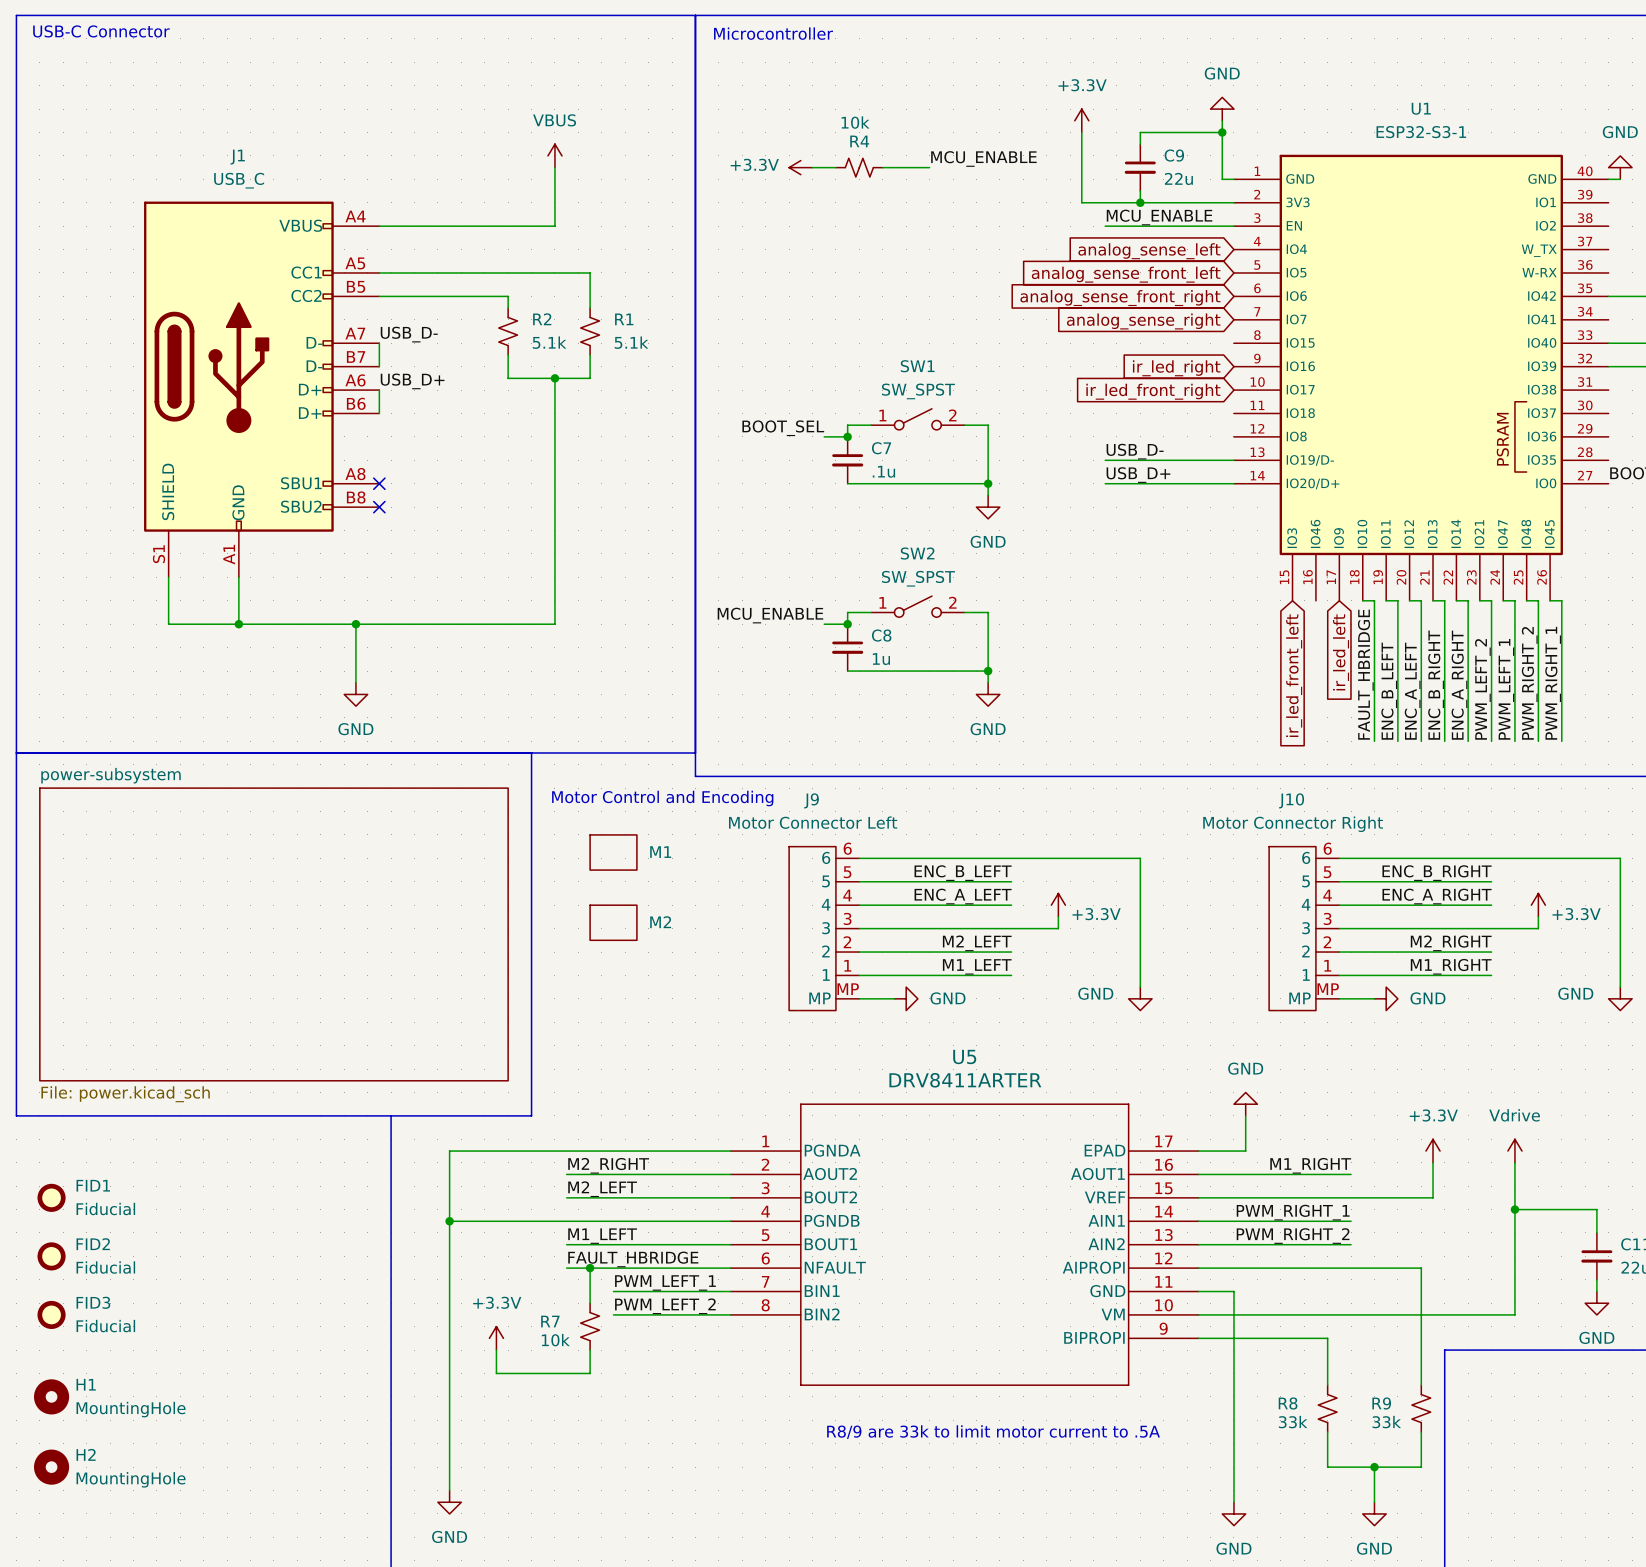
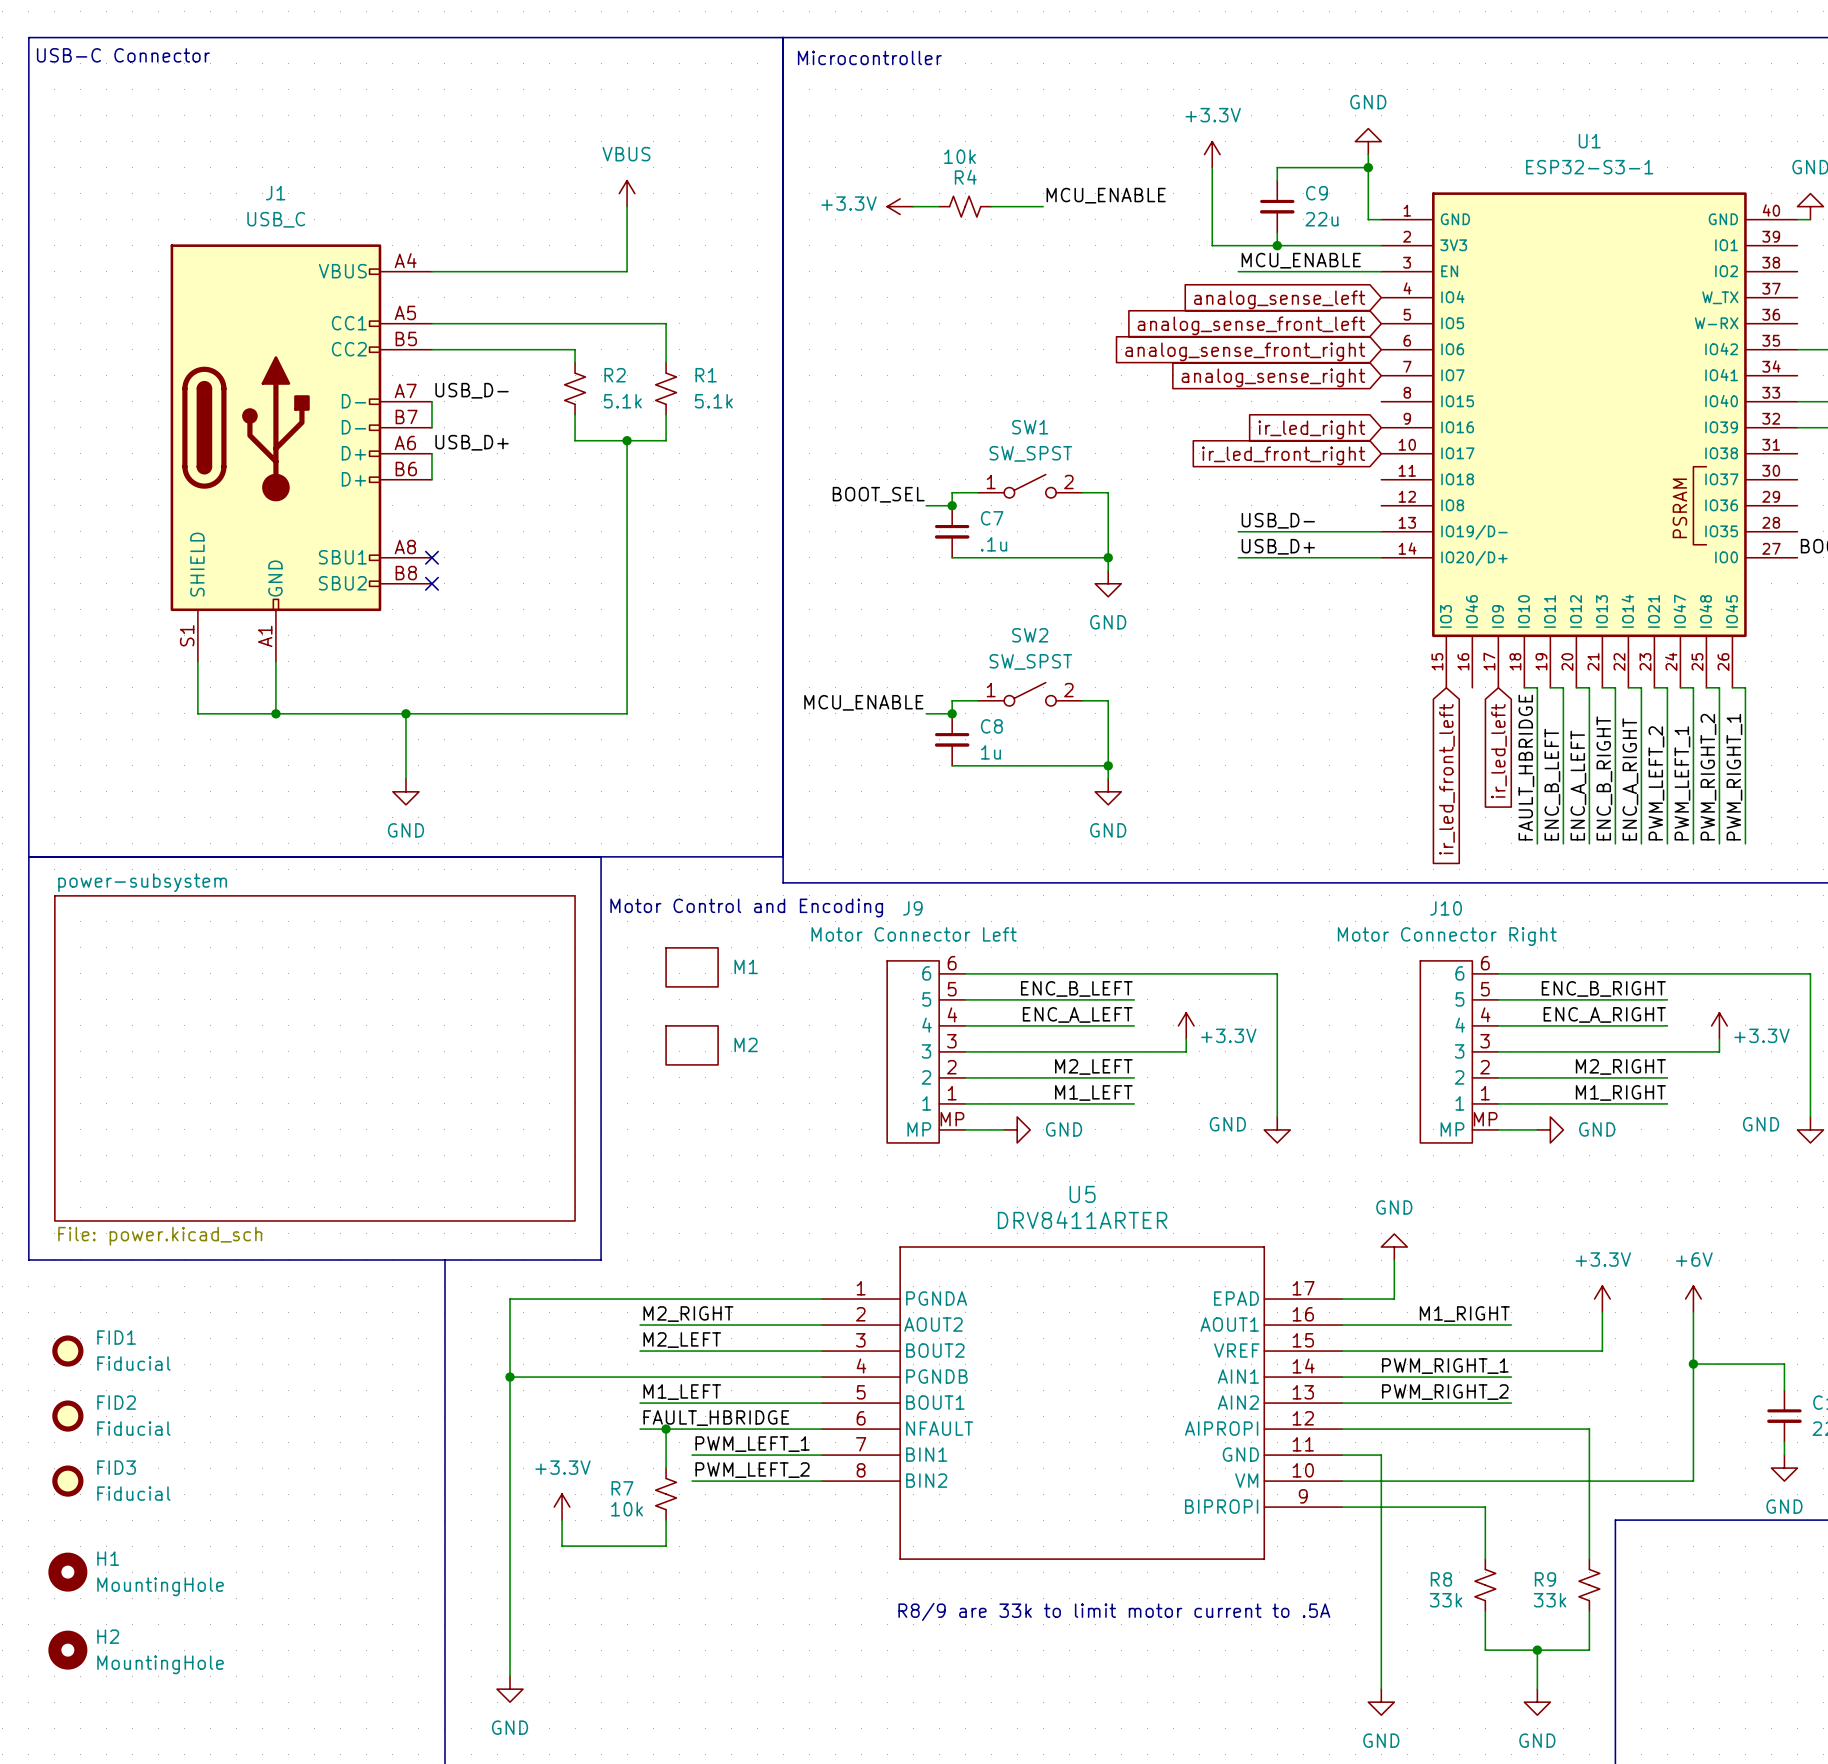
power symbol: Vdrive (1514, 1151) -> +6V (1693, 1299)

